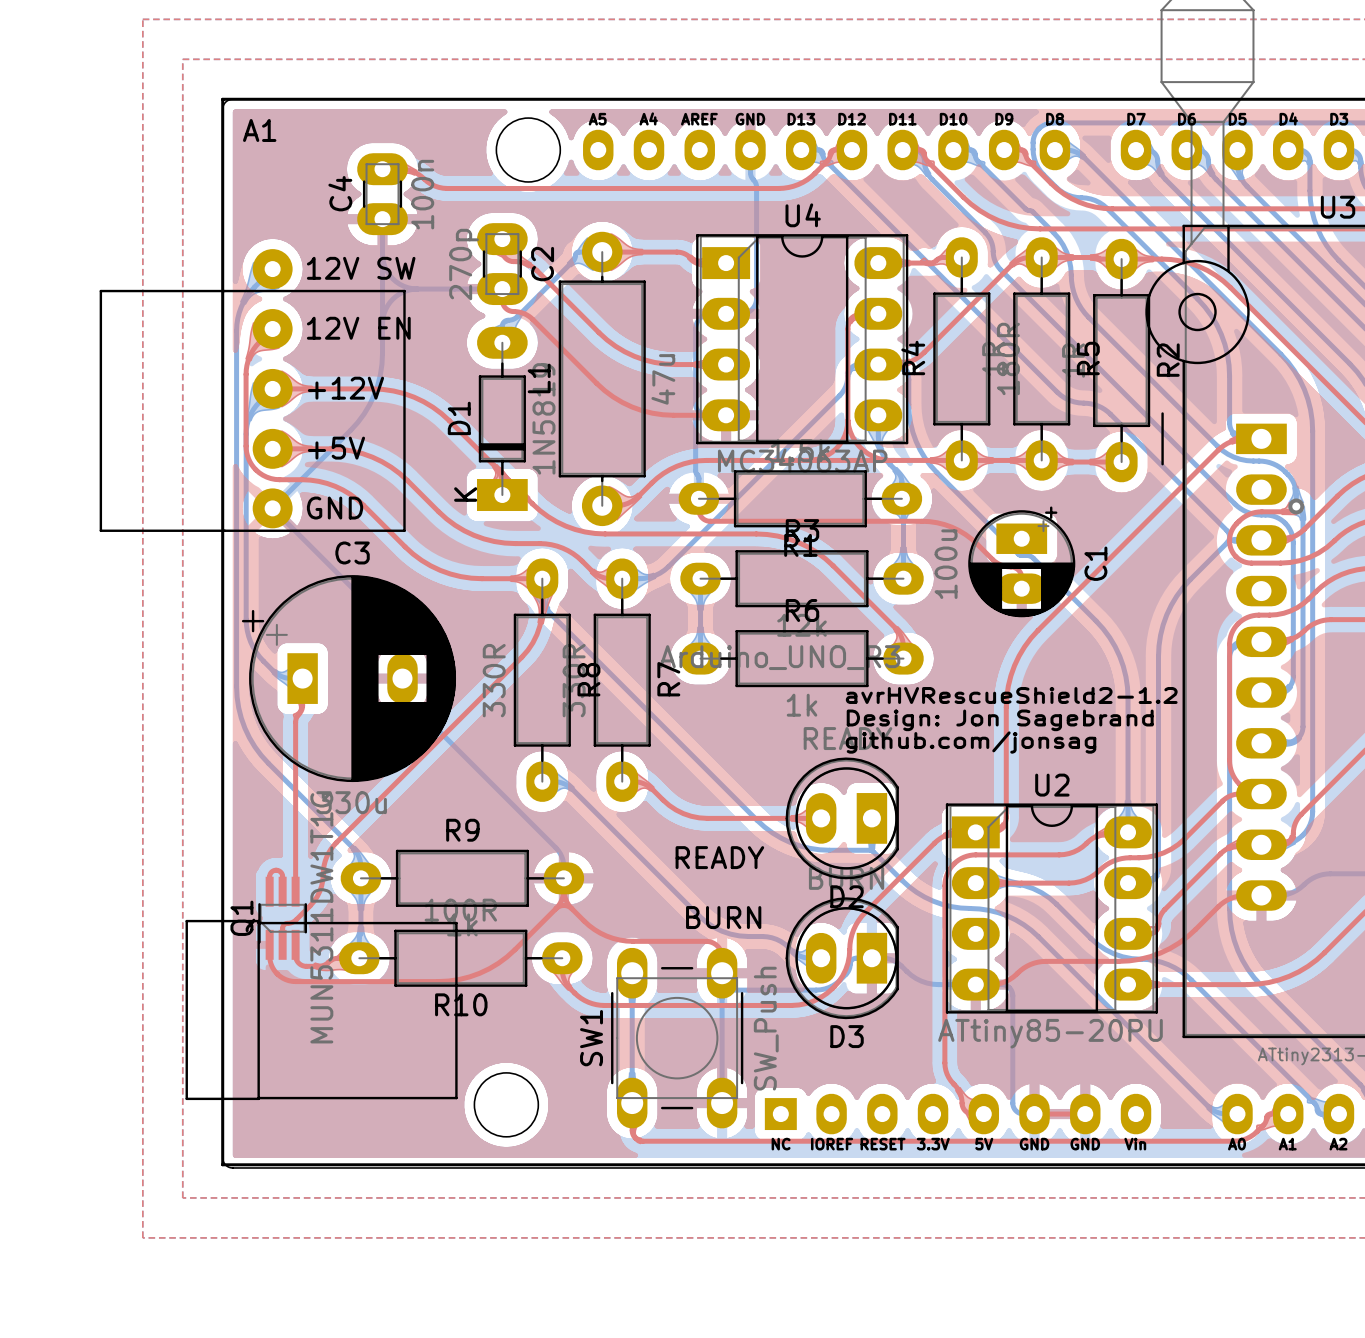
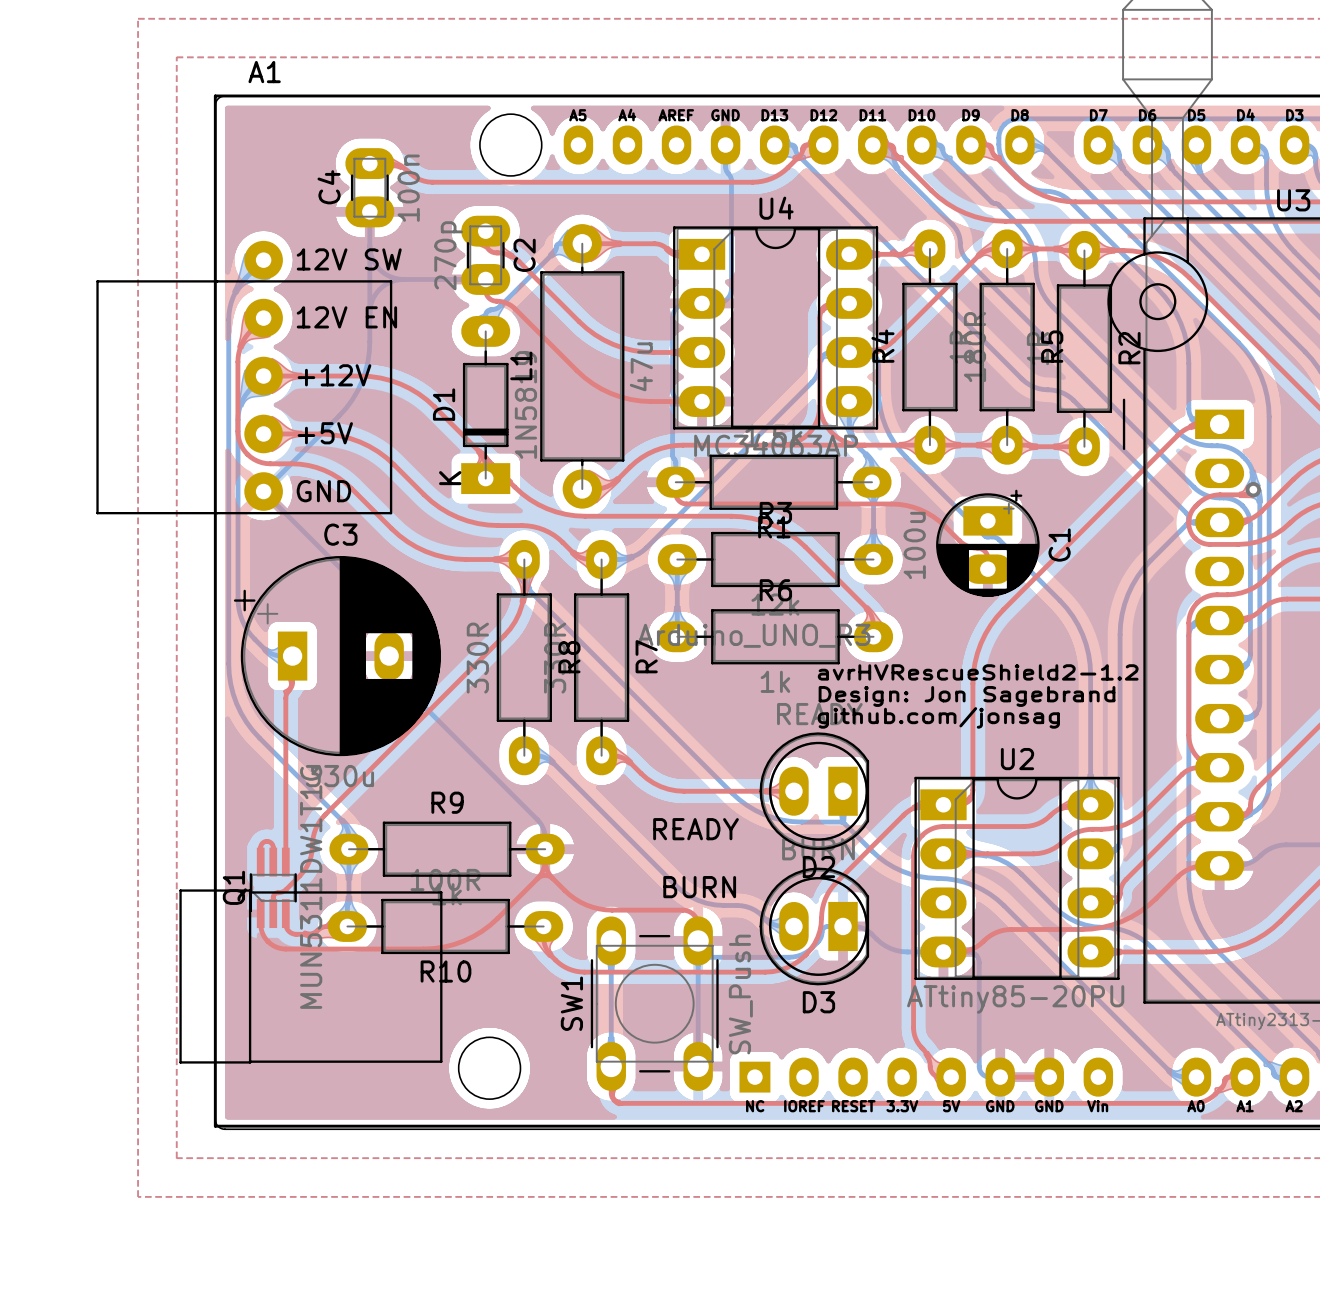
A1 name position: A1 (259, 130) -> A1 (264, 72)

